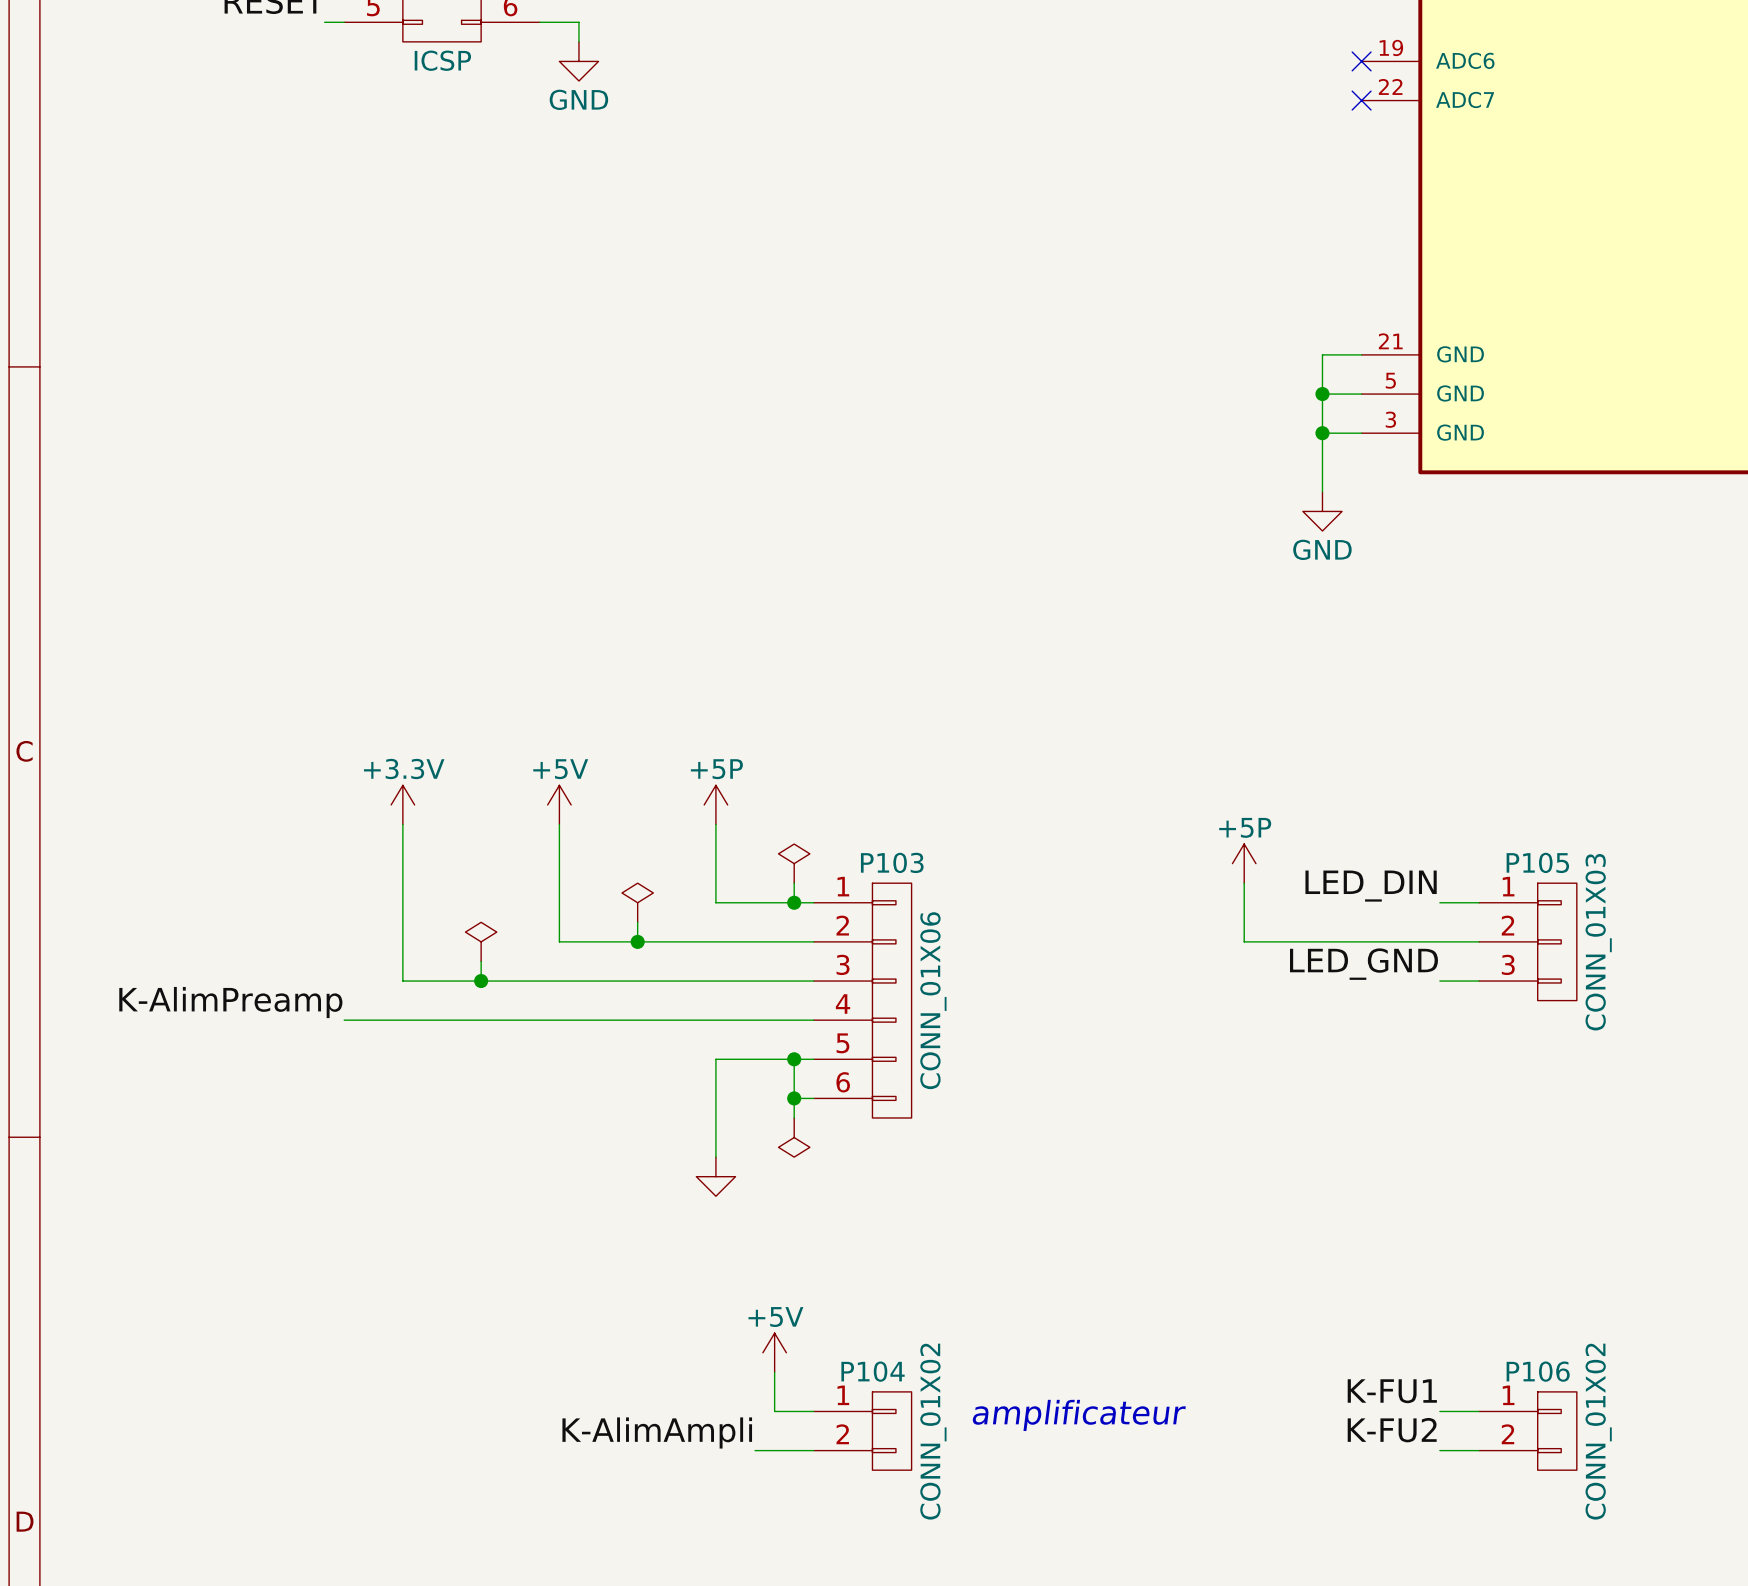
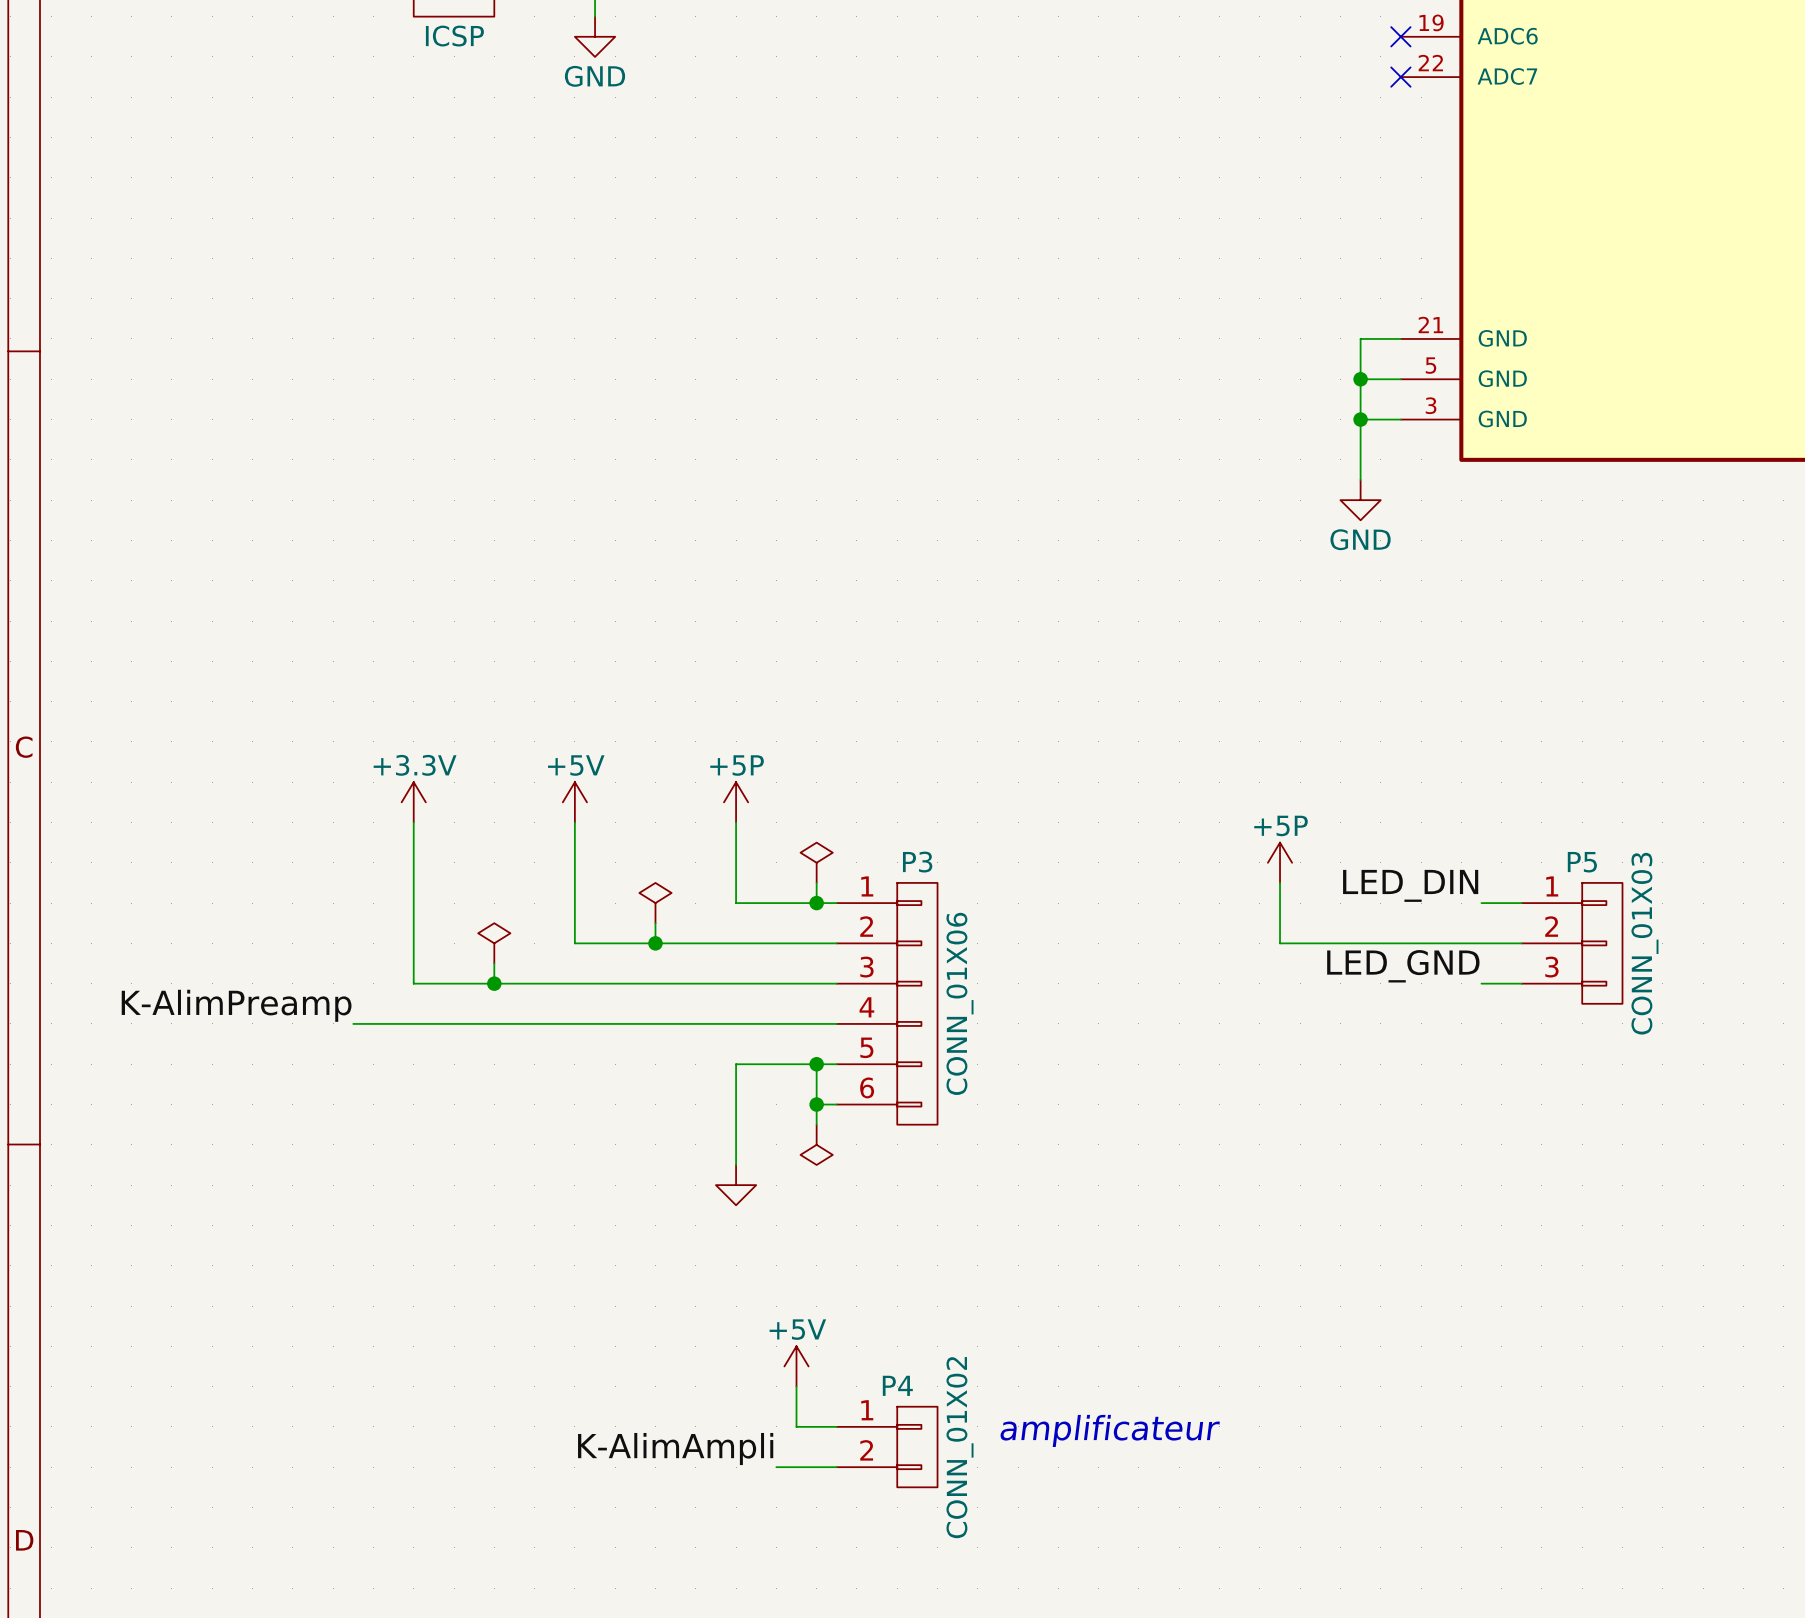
P103 name: P103 (892, 862) -> P3 (917, 862)
P105 name: P105 (1537, 862) -> P5 (1582, 862)
P104 name: P104 (873, 1371) -> P4 (897, 1385)
label: K-FU1 (1392, 1391) -> none
wire: (1439, 1411) (1479, 1411) -> none
label: K-FU2 (1392, 1430) -> none
P106: CONN_01X02 (1527, 1431) -> none
wire: (1439, 1450) (1479, 1450) -> none

